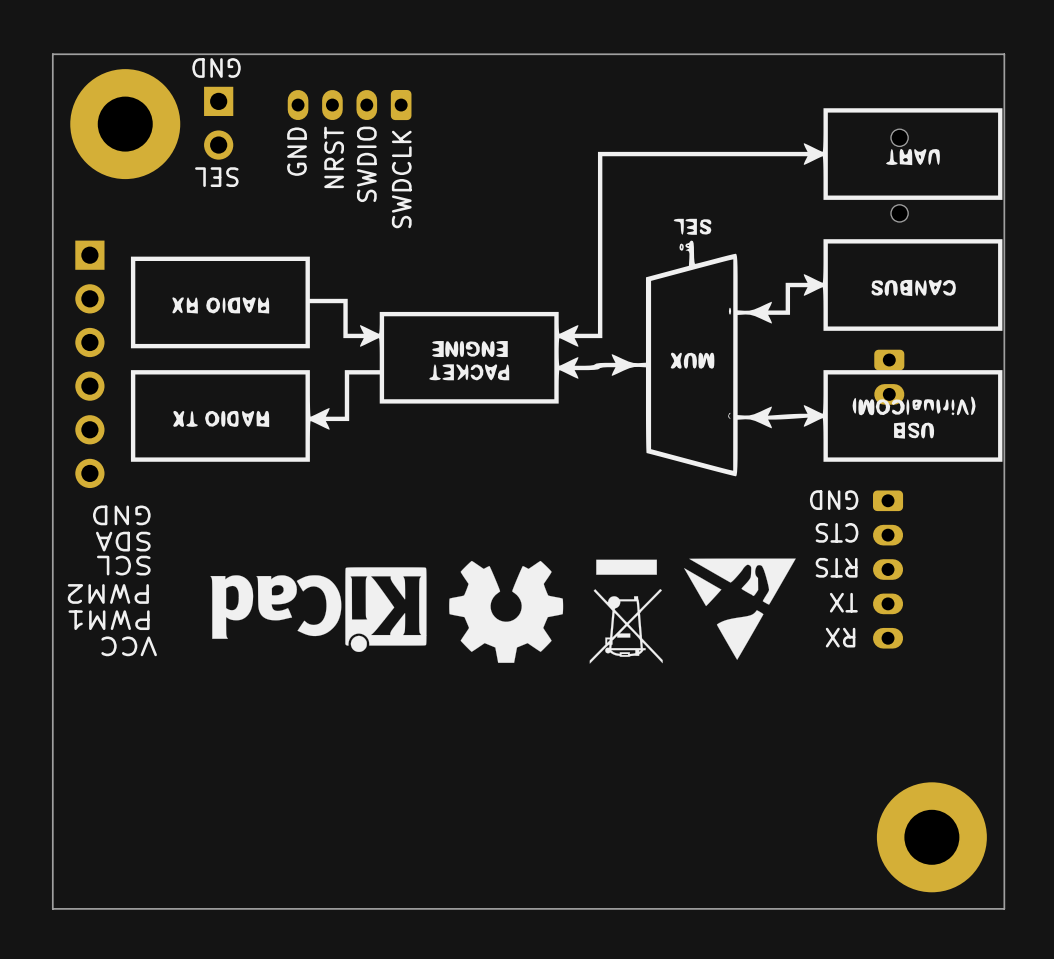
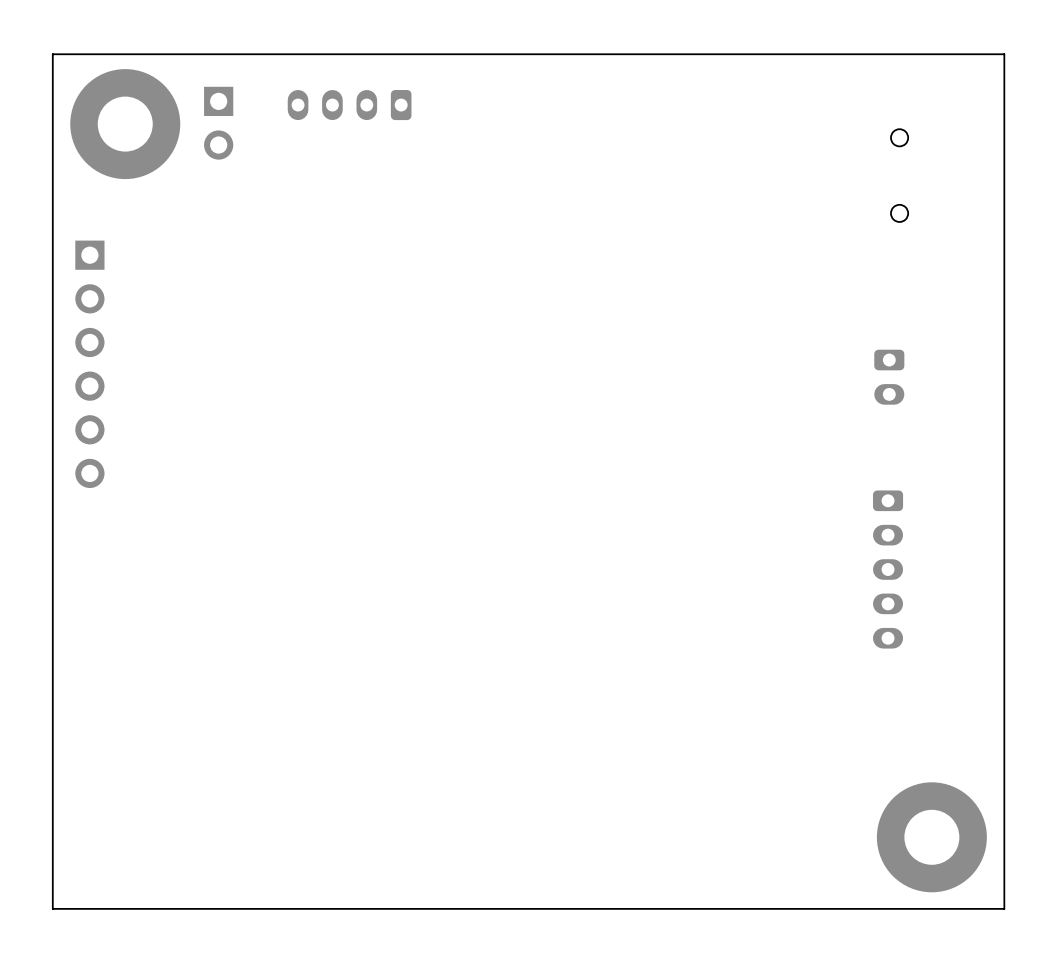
text: GND (216, 68) -> none
drawing: [130, 108, 1003, 477] -> none
text: GND (297, 151) -> none
text: NRST (334, 157) -> none
text: SWDIO (366, 164) -> none
text: SEL (216, 177) -> none
text: SWDCLK (401, 179) -> none
text: GND (834, 500) -> none
text: GND (121, 515) -> none
text: CTS (837, 532) -> none
text: SDA (123, 541) -> none
drawing: [684, 558, 796, 660] -> none
drawing: [589, 559, 663, 664] -> none
drawing: [449, 560, 564, 663] -> none
text: SCL (123, 565) -> none
drawing: [210, 567, 427, 652] -> none
text: RTS (836, 567) -> none
text: PWM2 (108, 593) -> none
text: TX (843, 602) -> none
text: PWM1 (109, 620) -> none
text: RX (840, 637) -> none
text: VCC (129, 646) -> none

